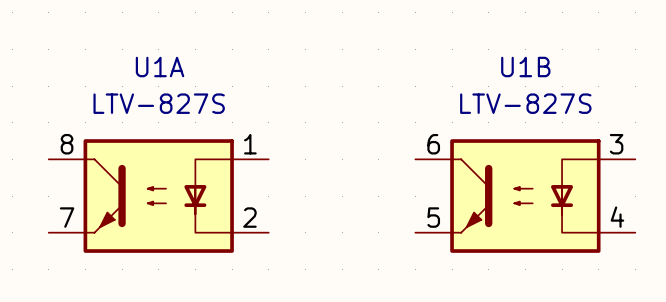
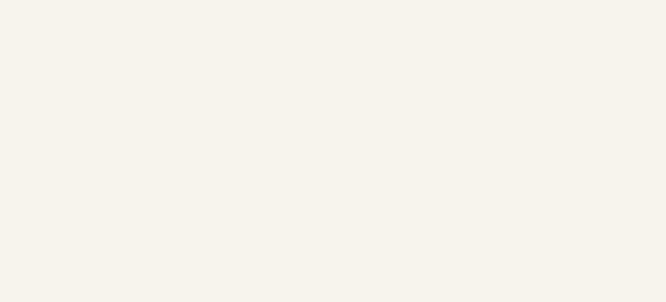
U1A: LTV-827S (158, 196) -> none
U1B: LTV-827S (525, 196) -> none

